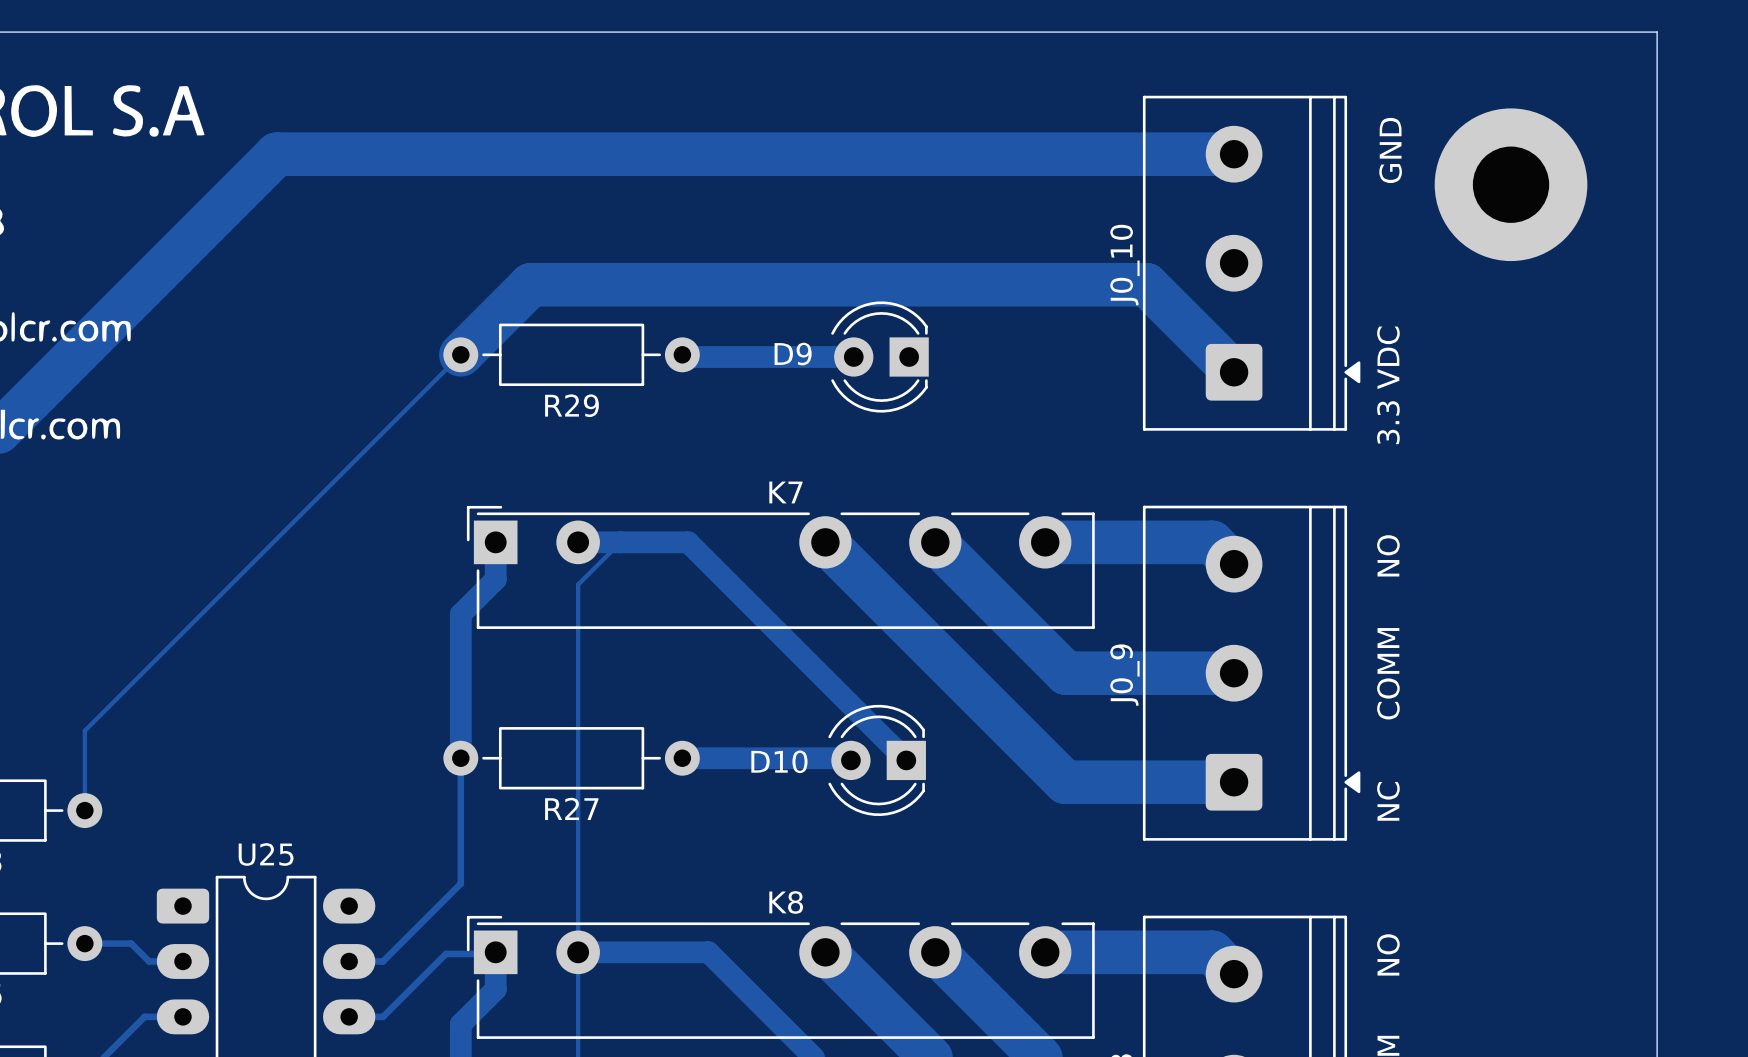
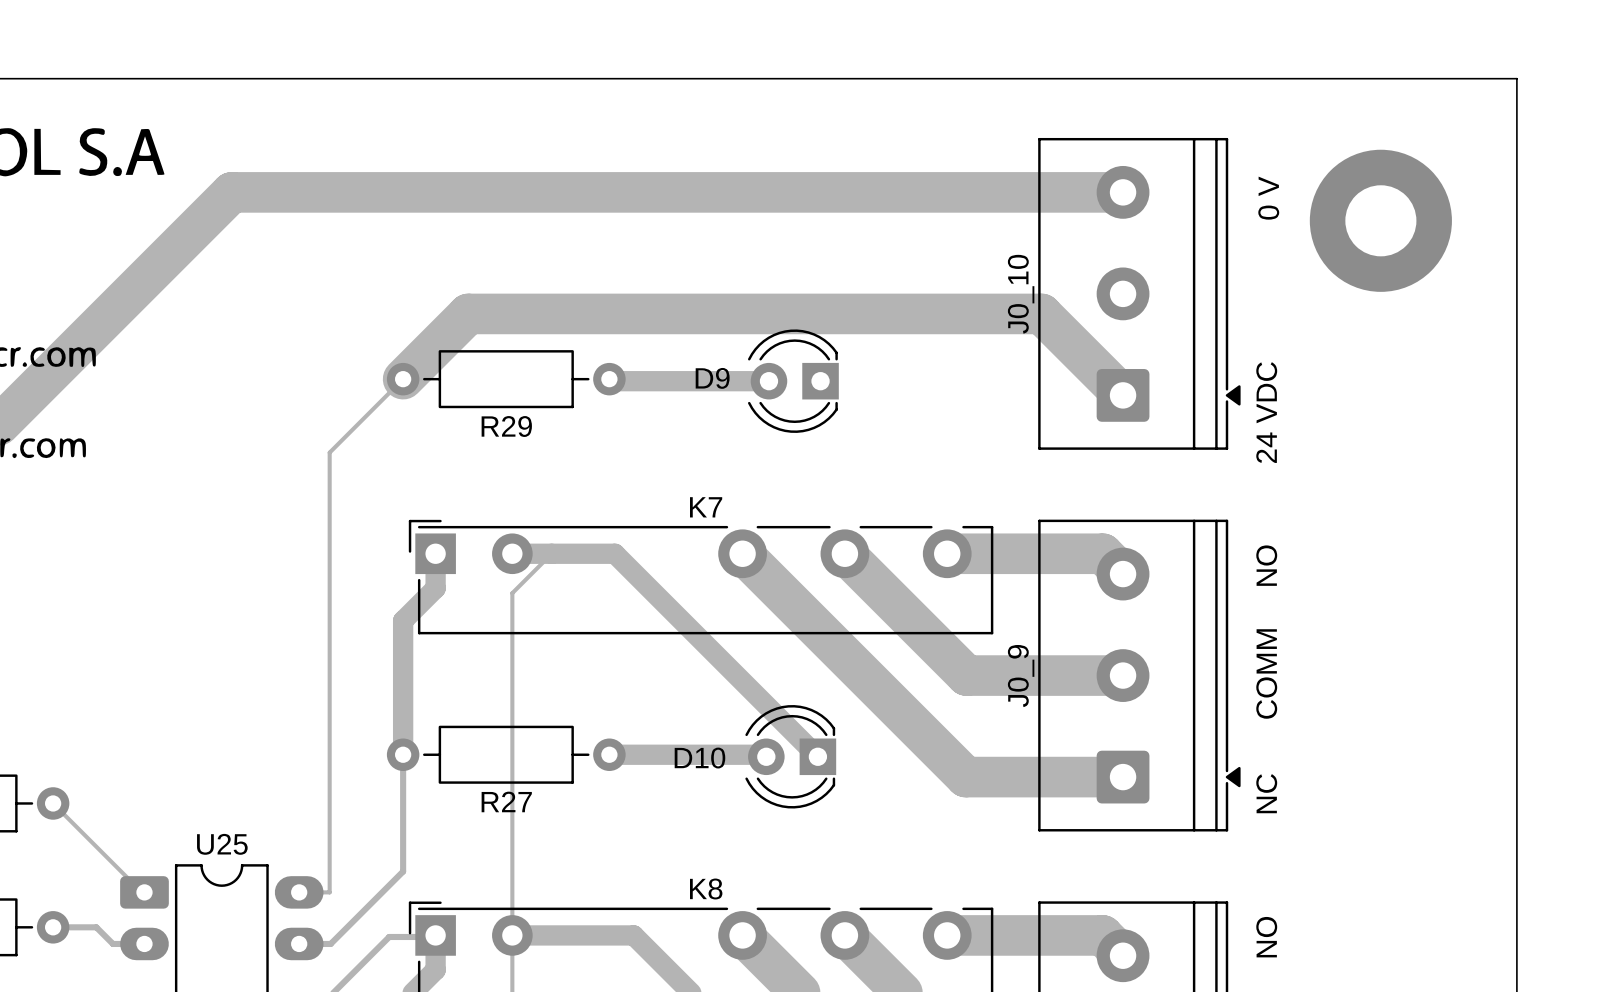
text: GND (1390, 150) -> 0 V (1268, 198)
text: 3.3 VDC (1388, 385) -> 24 VDC (1266, 412)
track: (381, 433) (84, 730) (84, 810) -> (329, 452) (329, 892) (299, 892)
track: none -> (53, 803) (142, 892) (144, 892)

